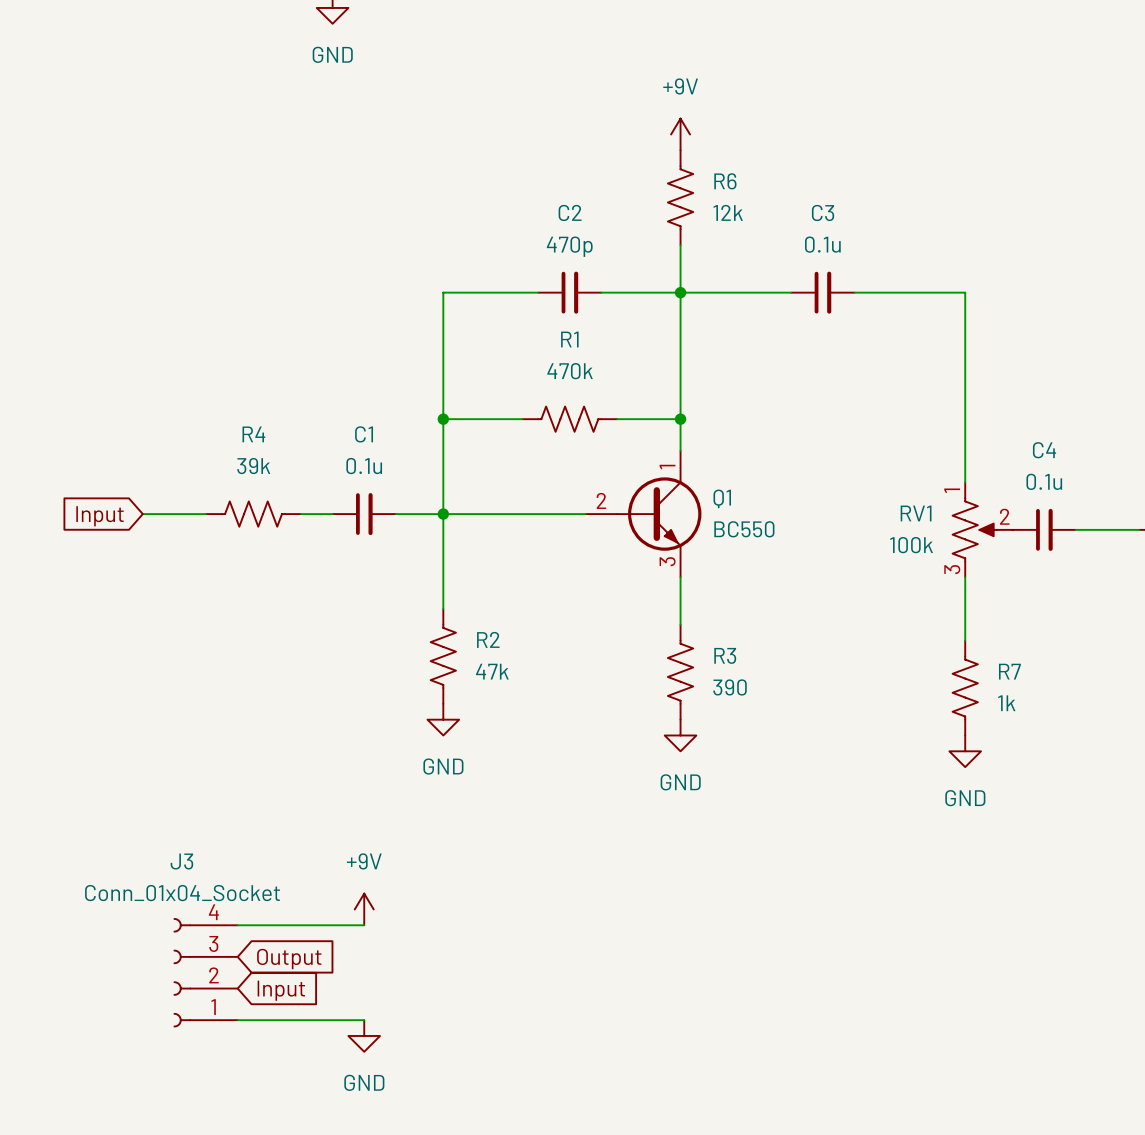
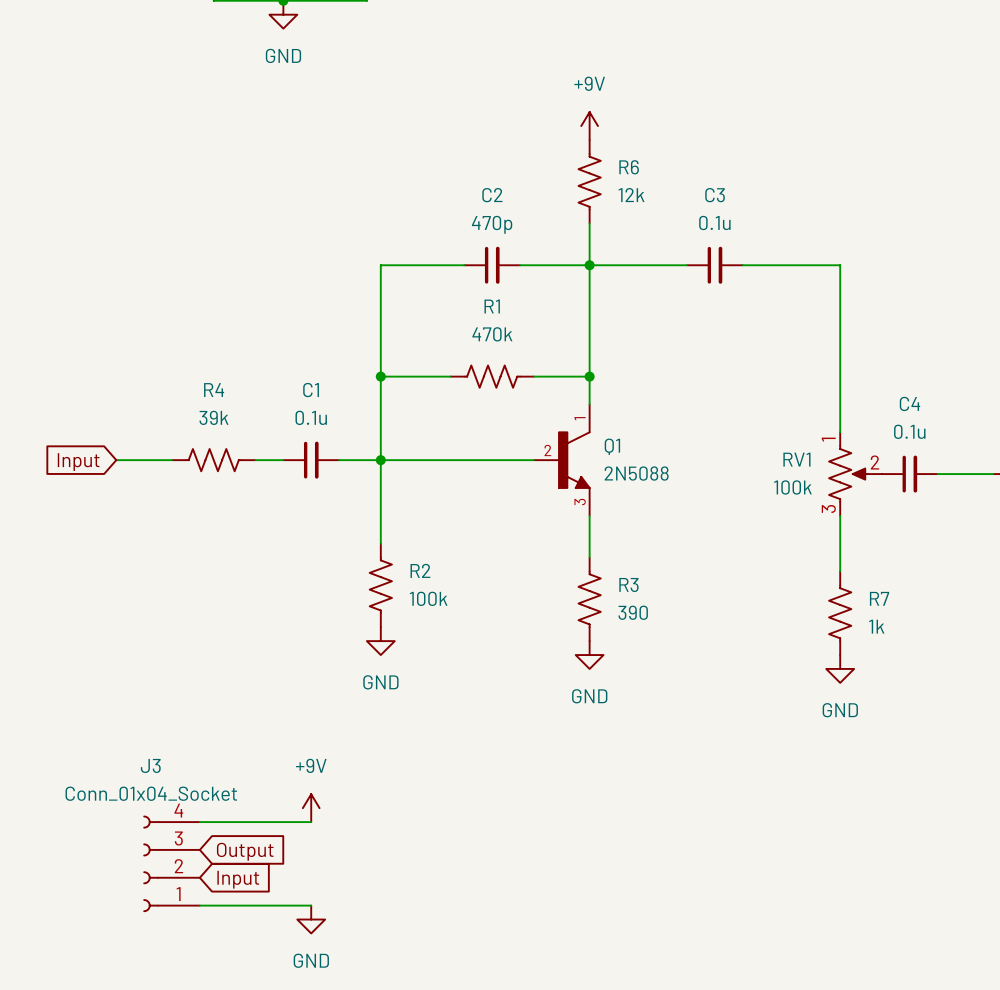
Q1 symbol: [585, 450, 702, 578] -> [533, 404, 591, 516]
Q1 value: BC550 (744, 529) -> 2N5088 (636, 473)
R2 value: 47k (492, 671) -> 100k (428, 598)

